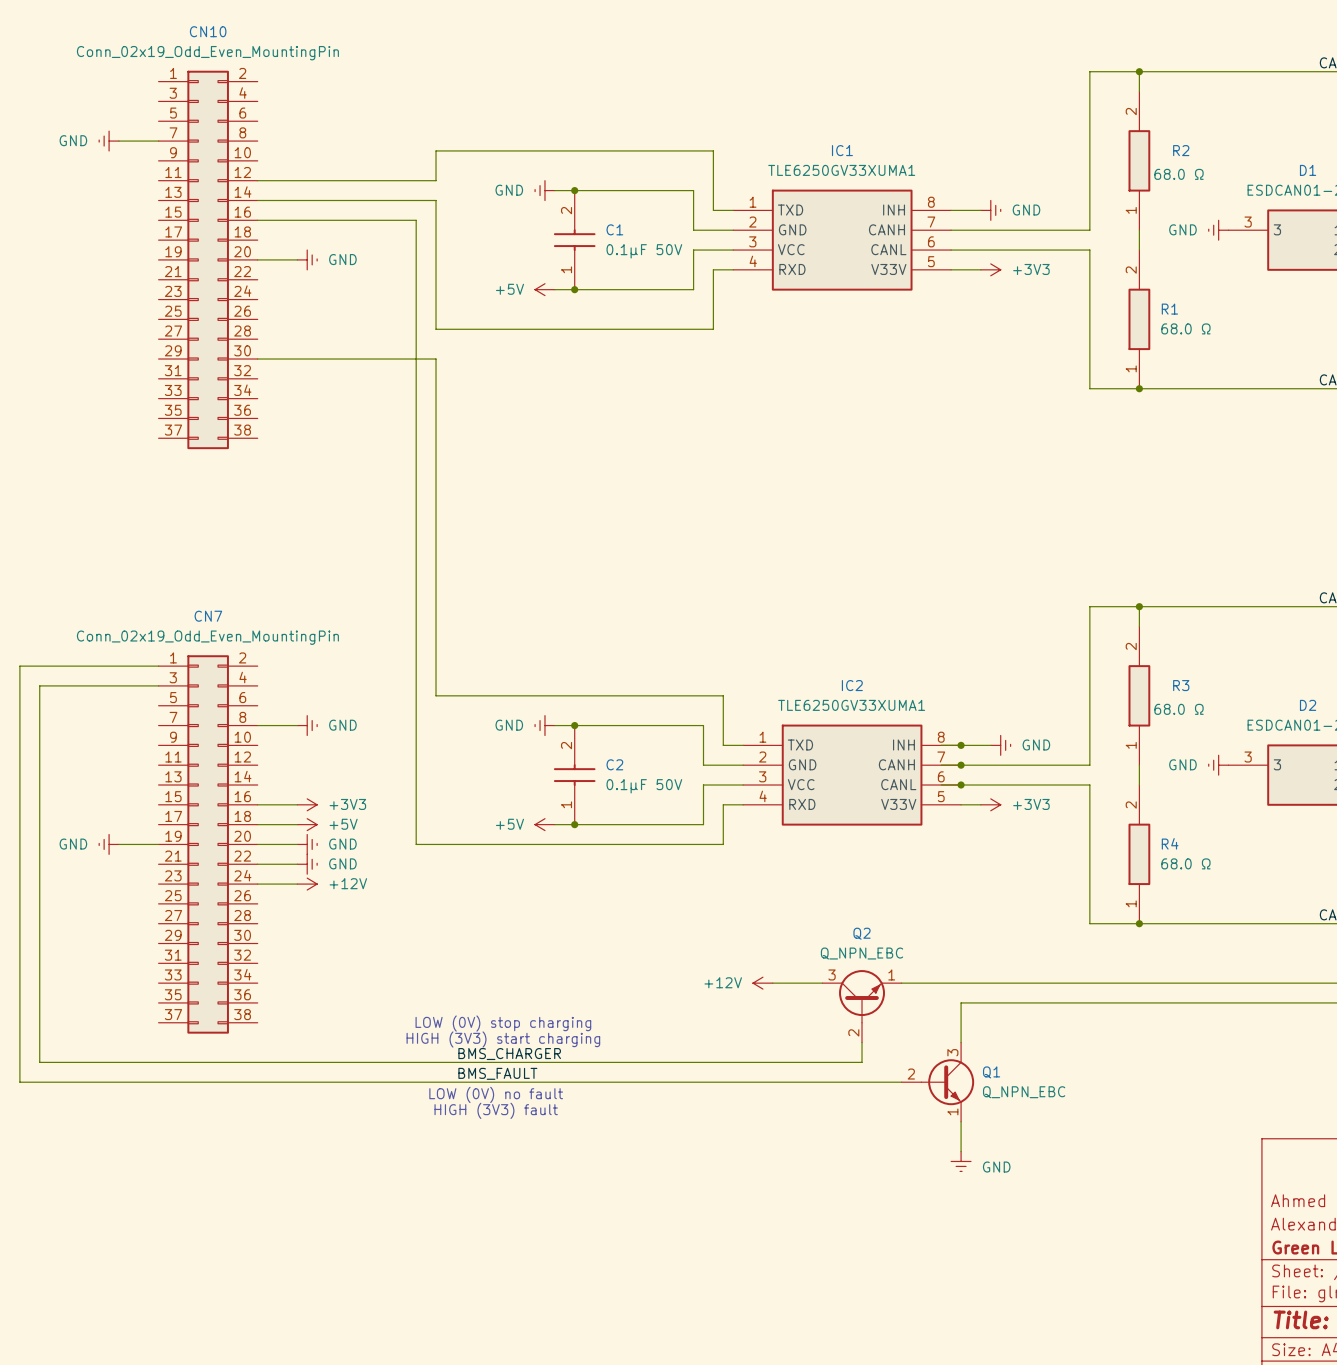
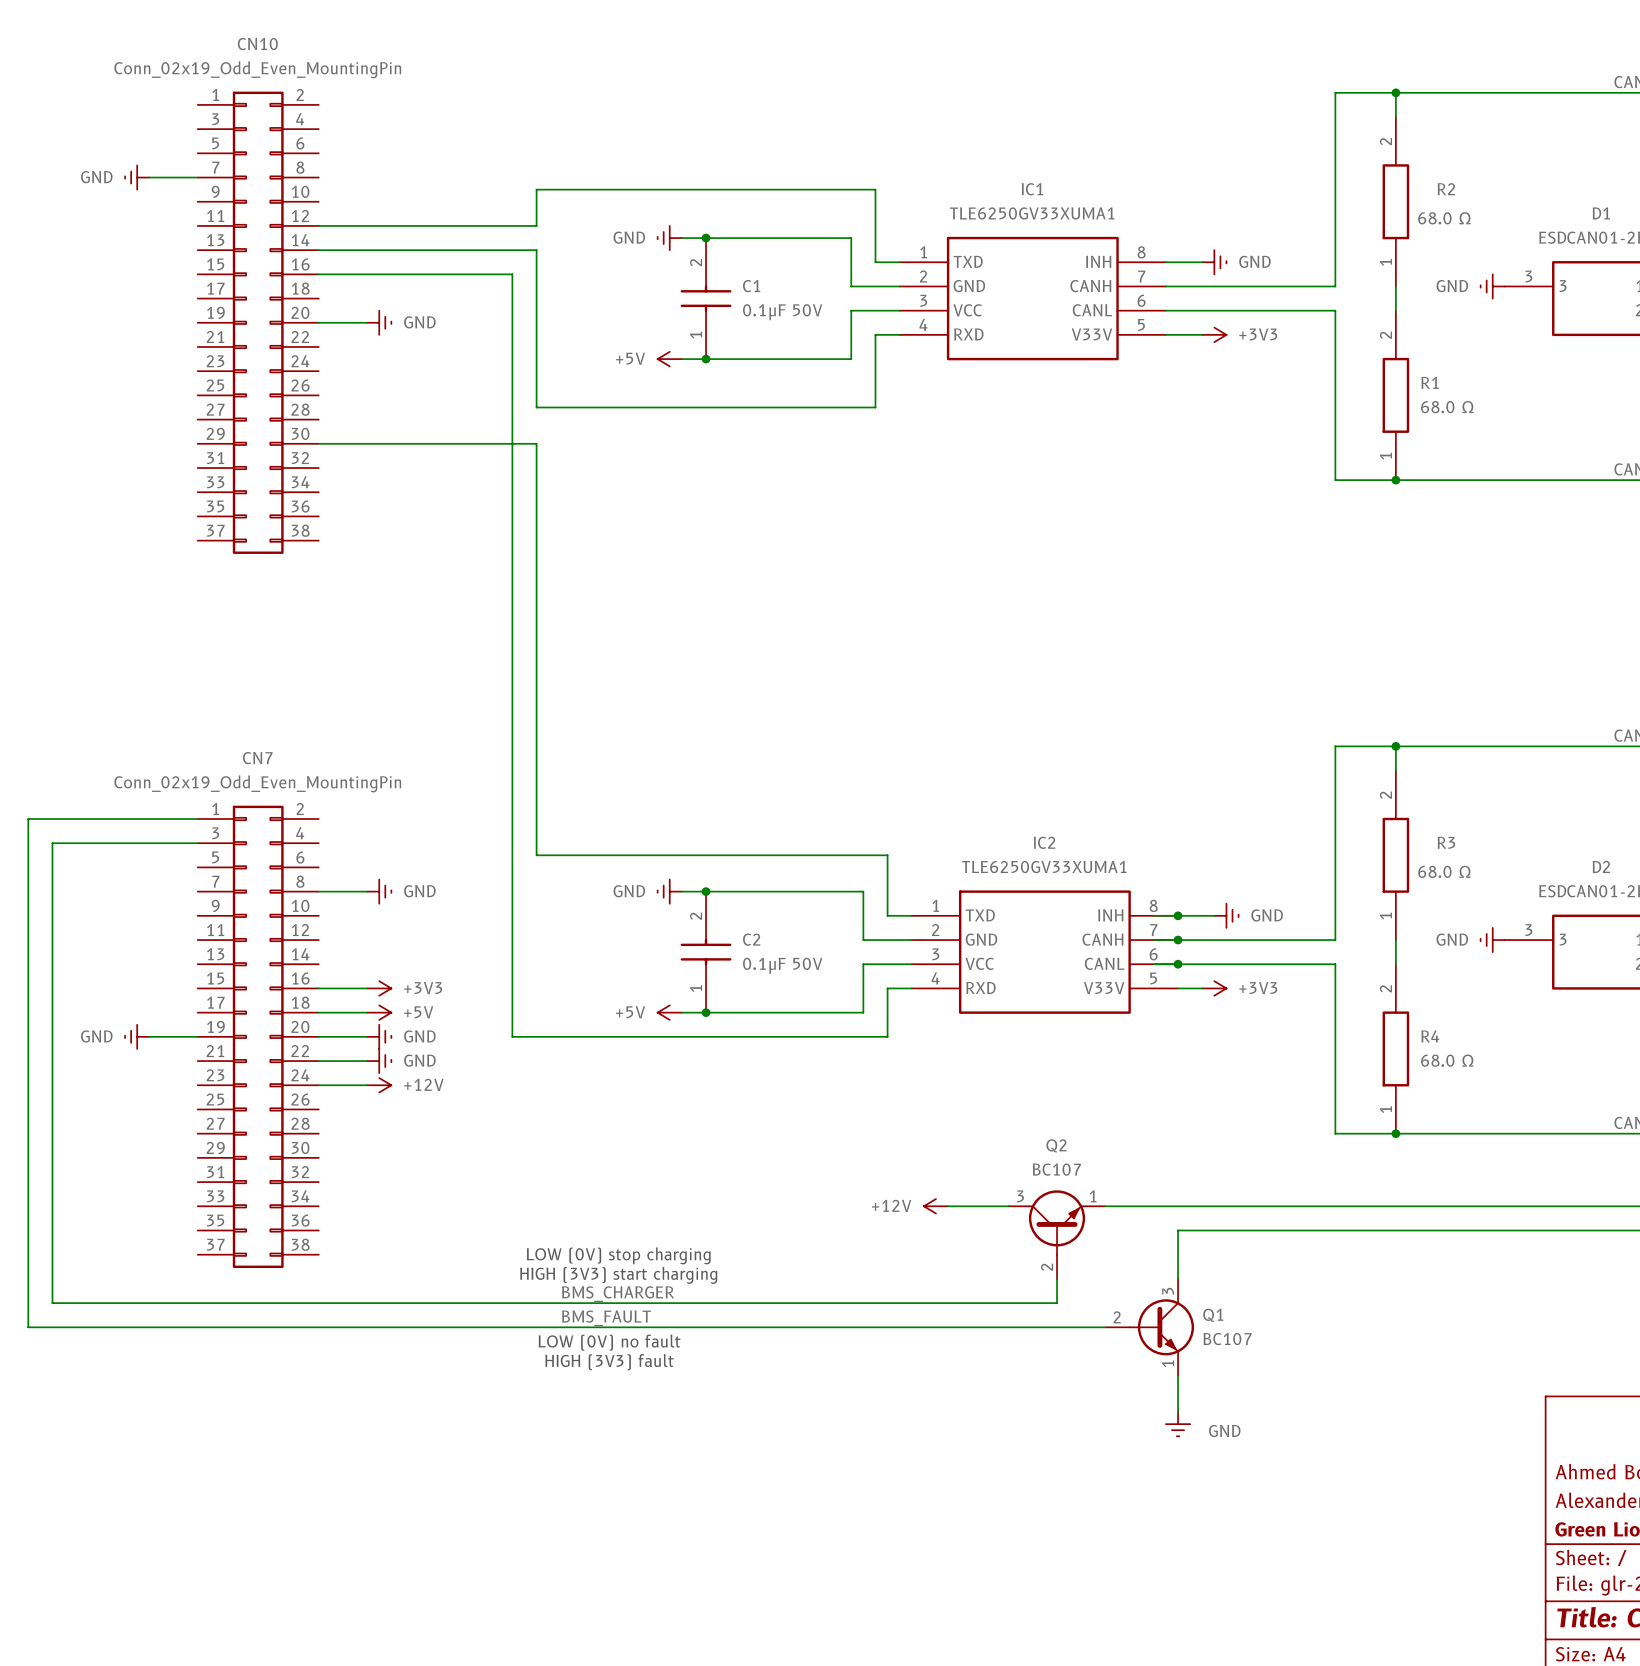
Q2 value: Q_NPN_EBC (862, 953) -> BC107 (1056, 1169)
Q1 value: Q_NPN_EBC (1024, 1092) -> BC107 (1227, 1339)

